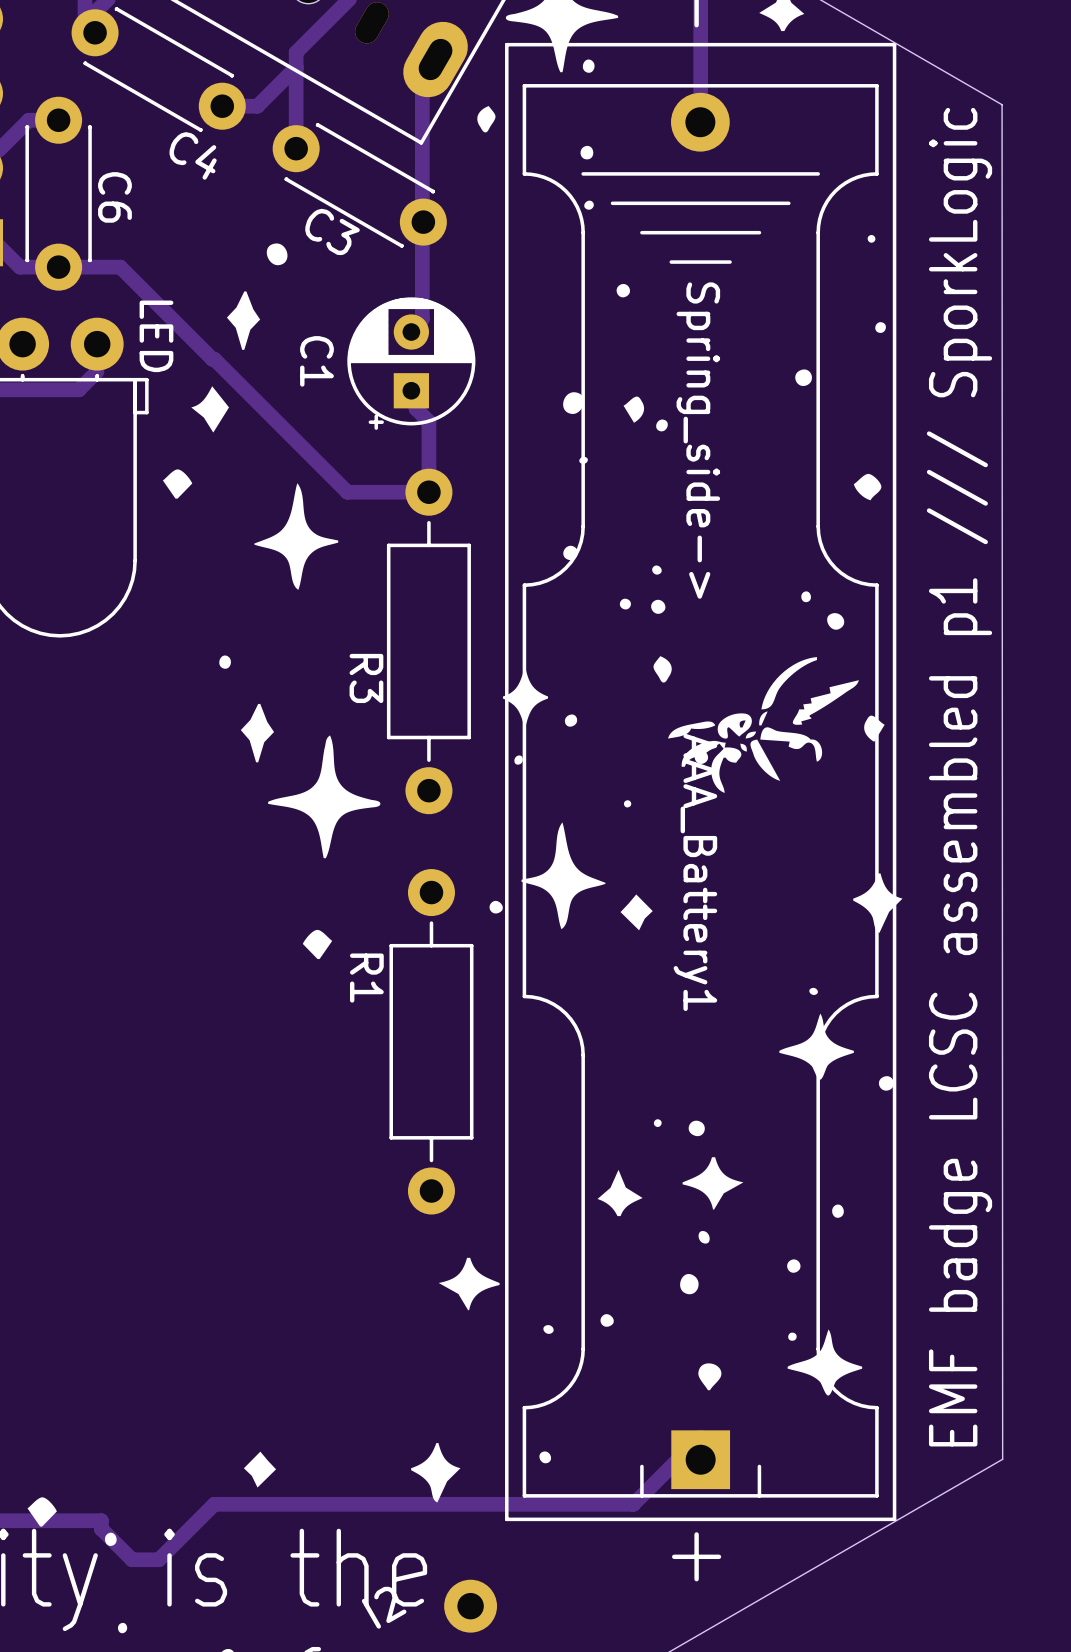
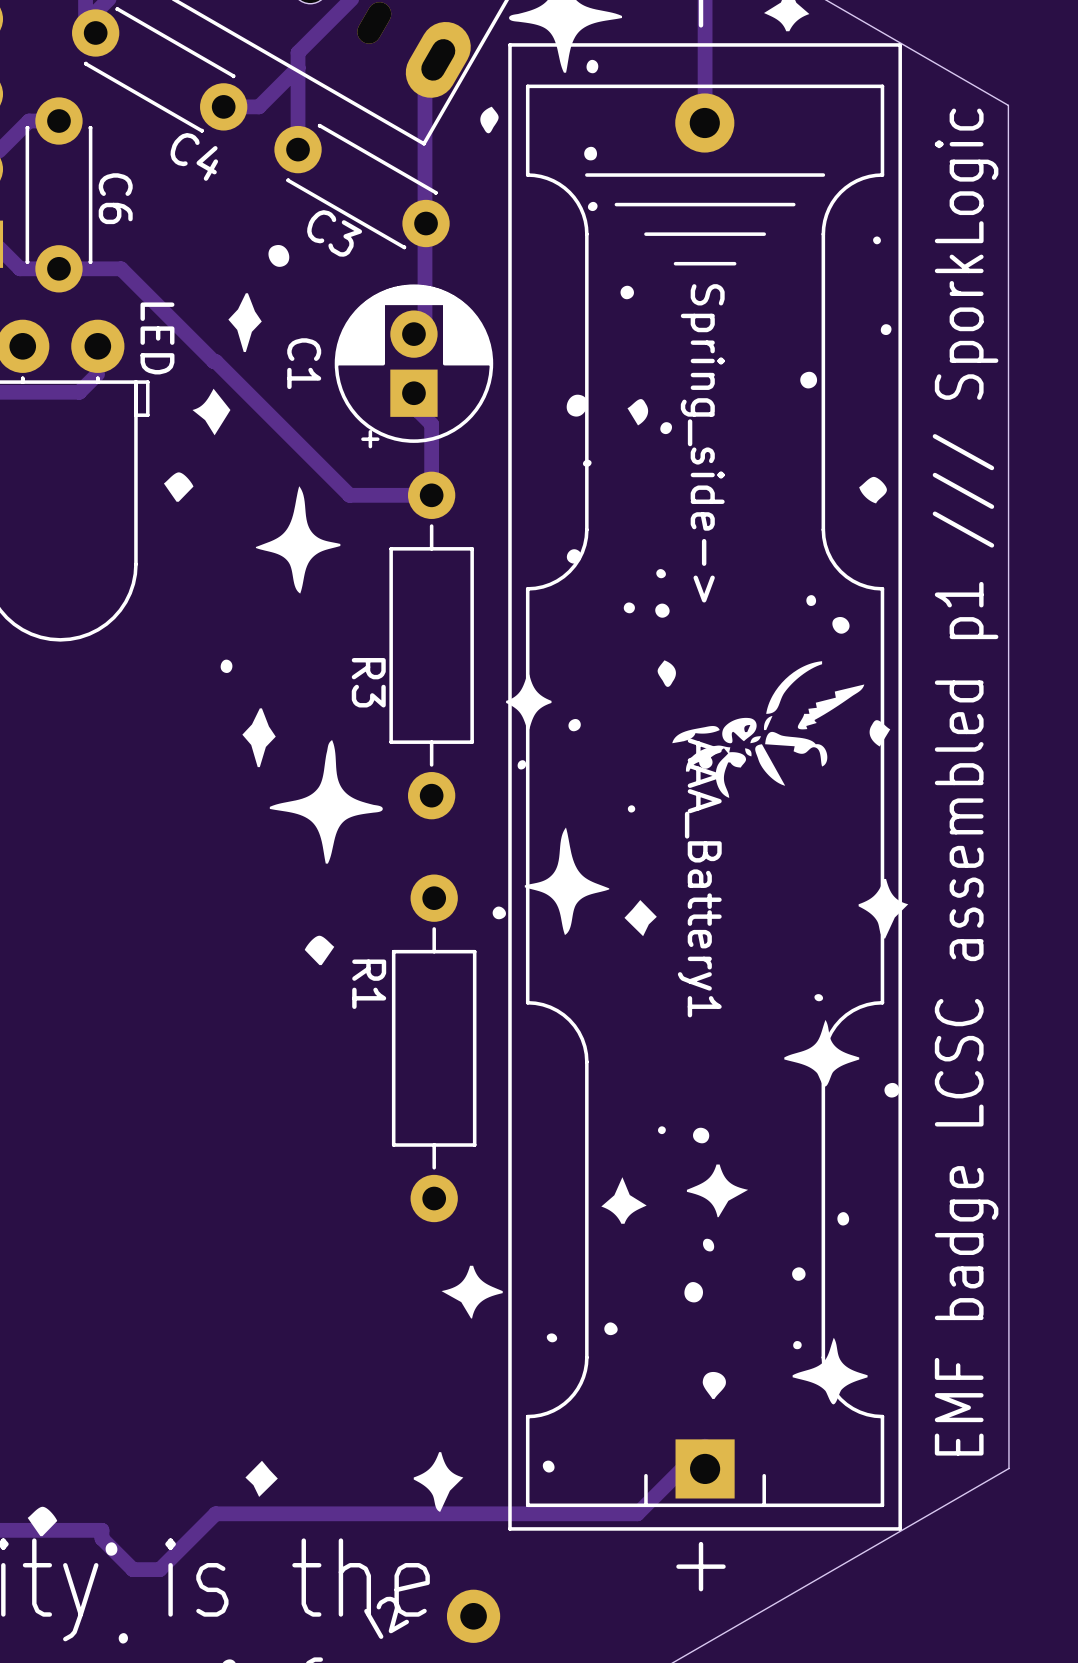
C1 footprint: [347, 297, 476, 430] -> [334, 284, 494, 449]

